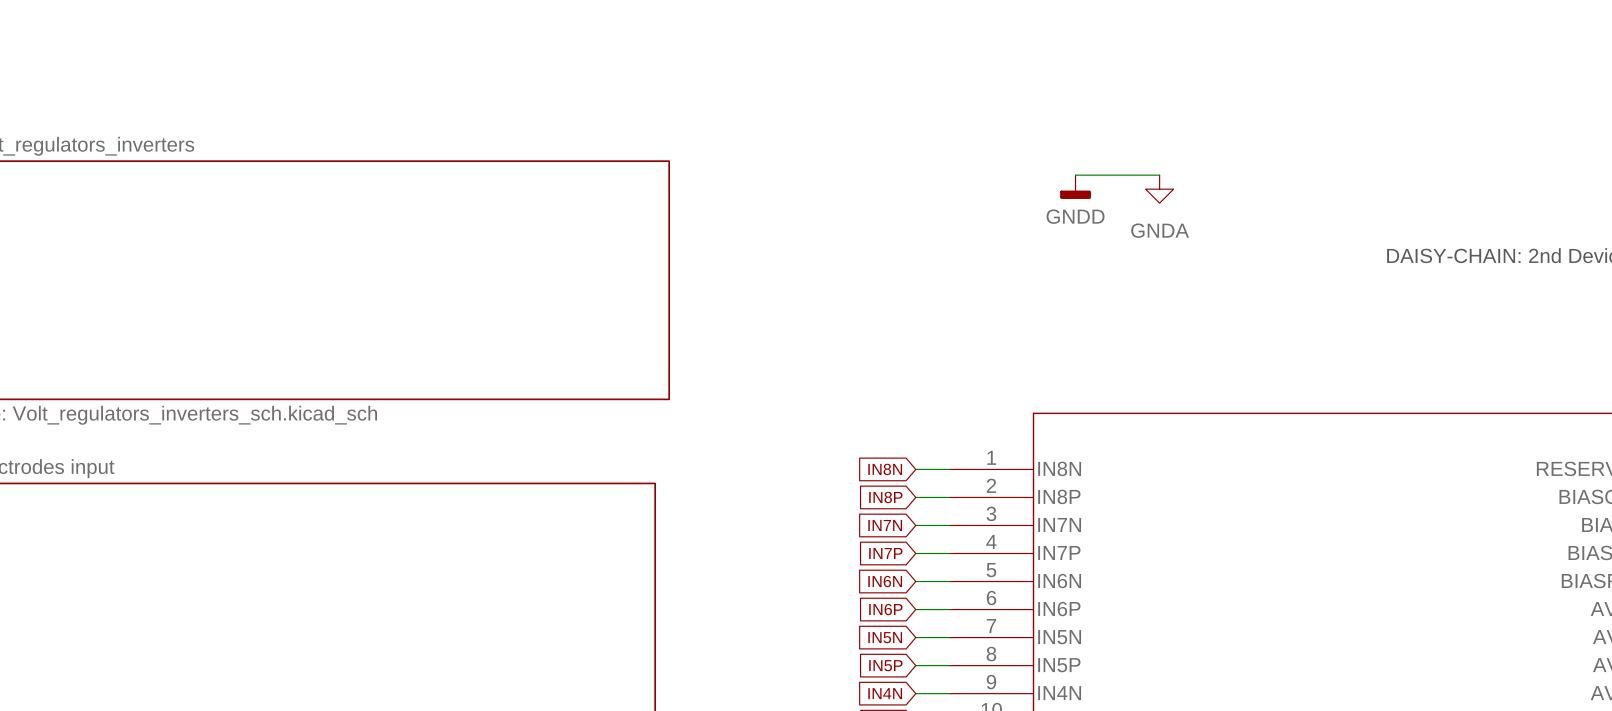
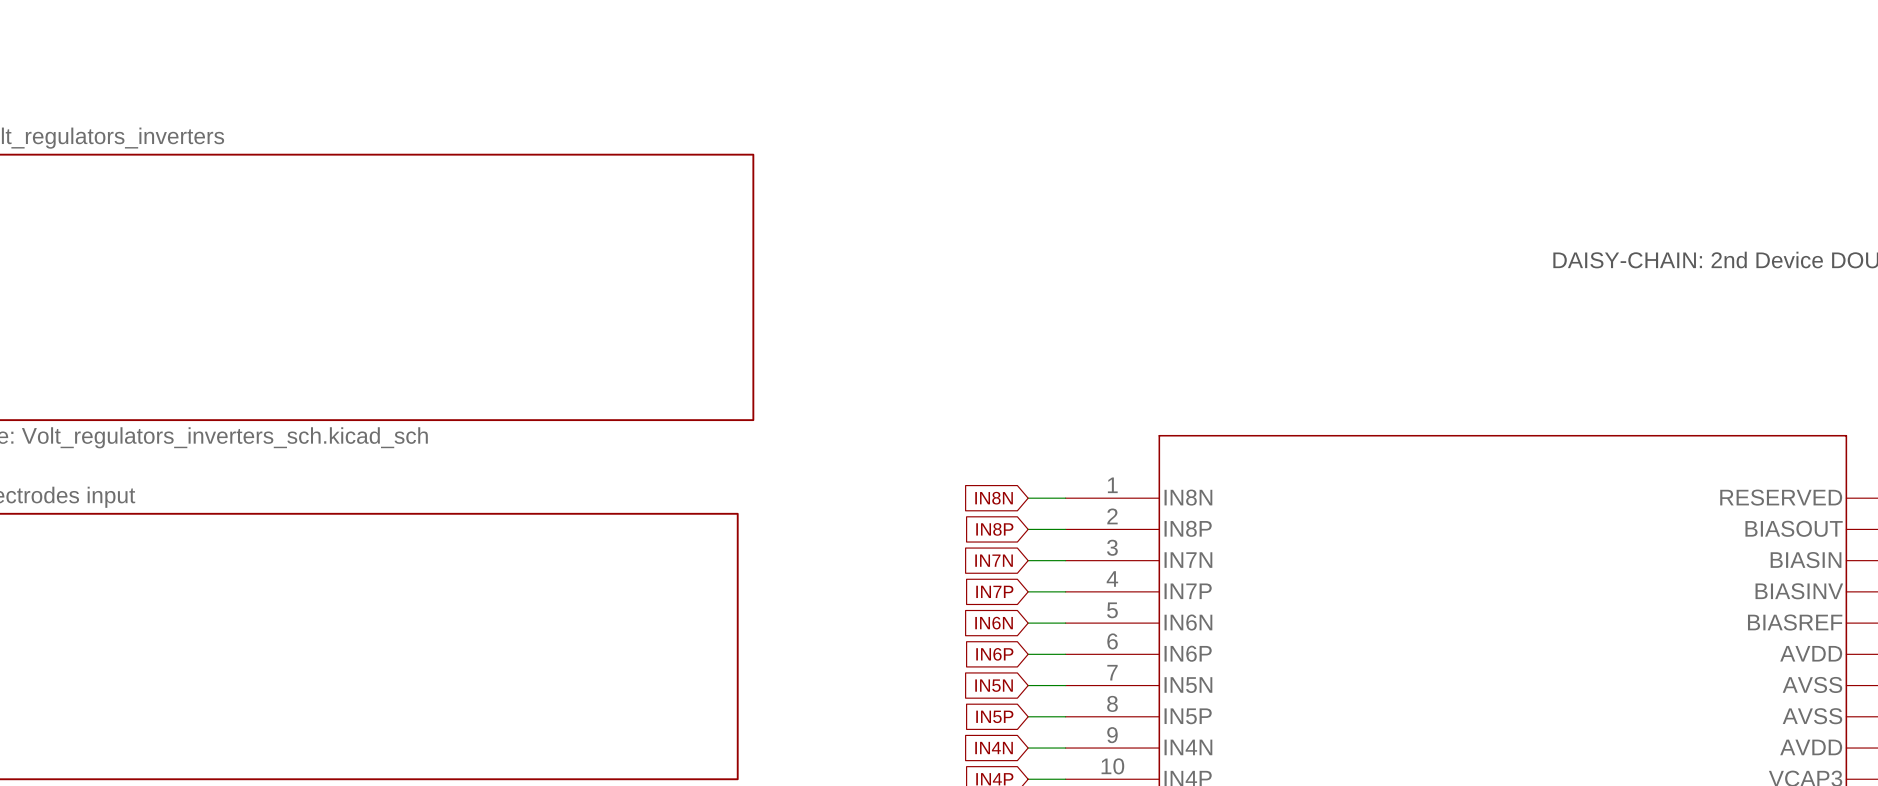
wire: (1075, 175) (1159, 175) -> none
power symbol: GNDD (1075, 187) -> none
power symbol: GNDA (1159, 189) -> none

